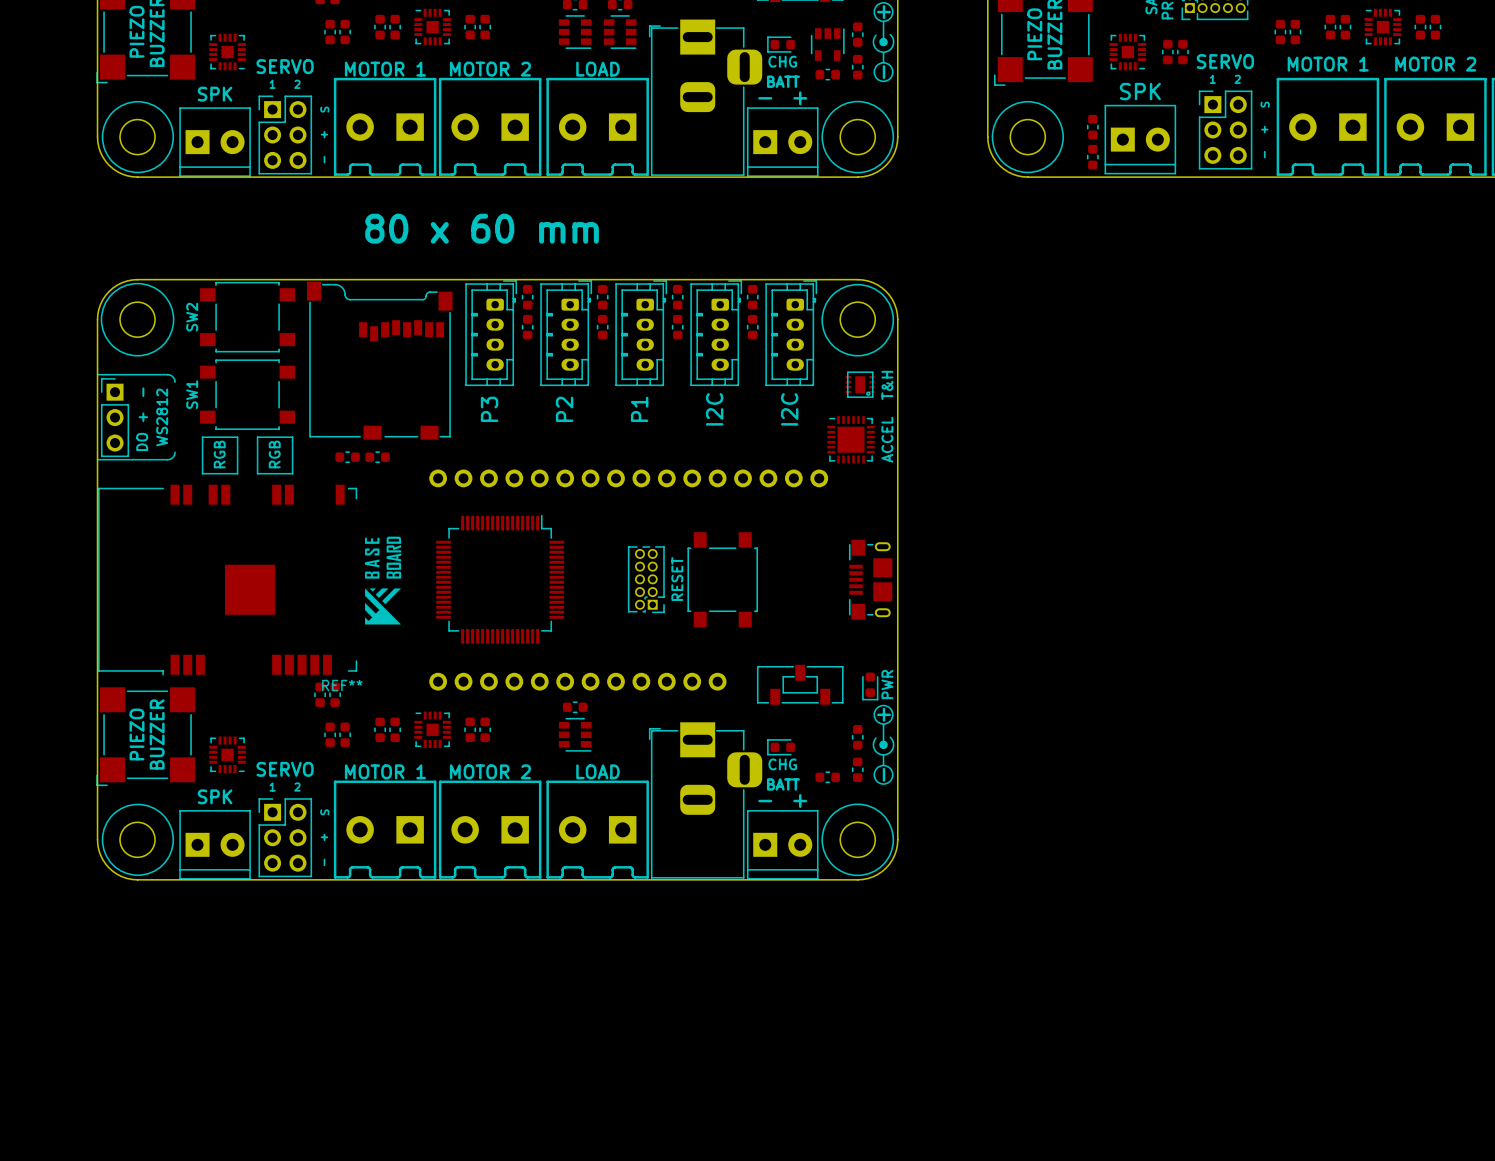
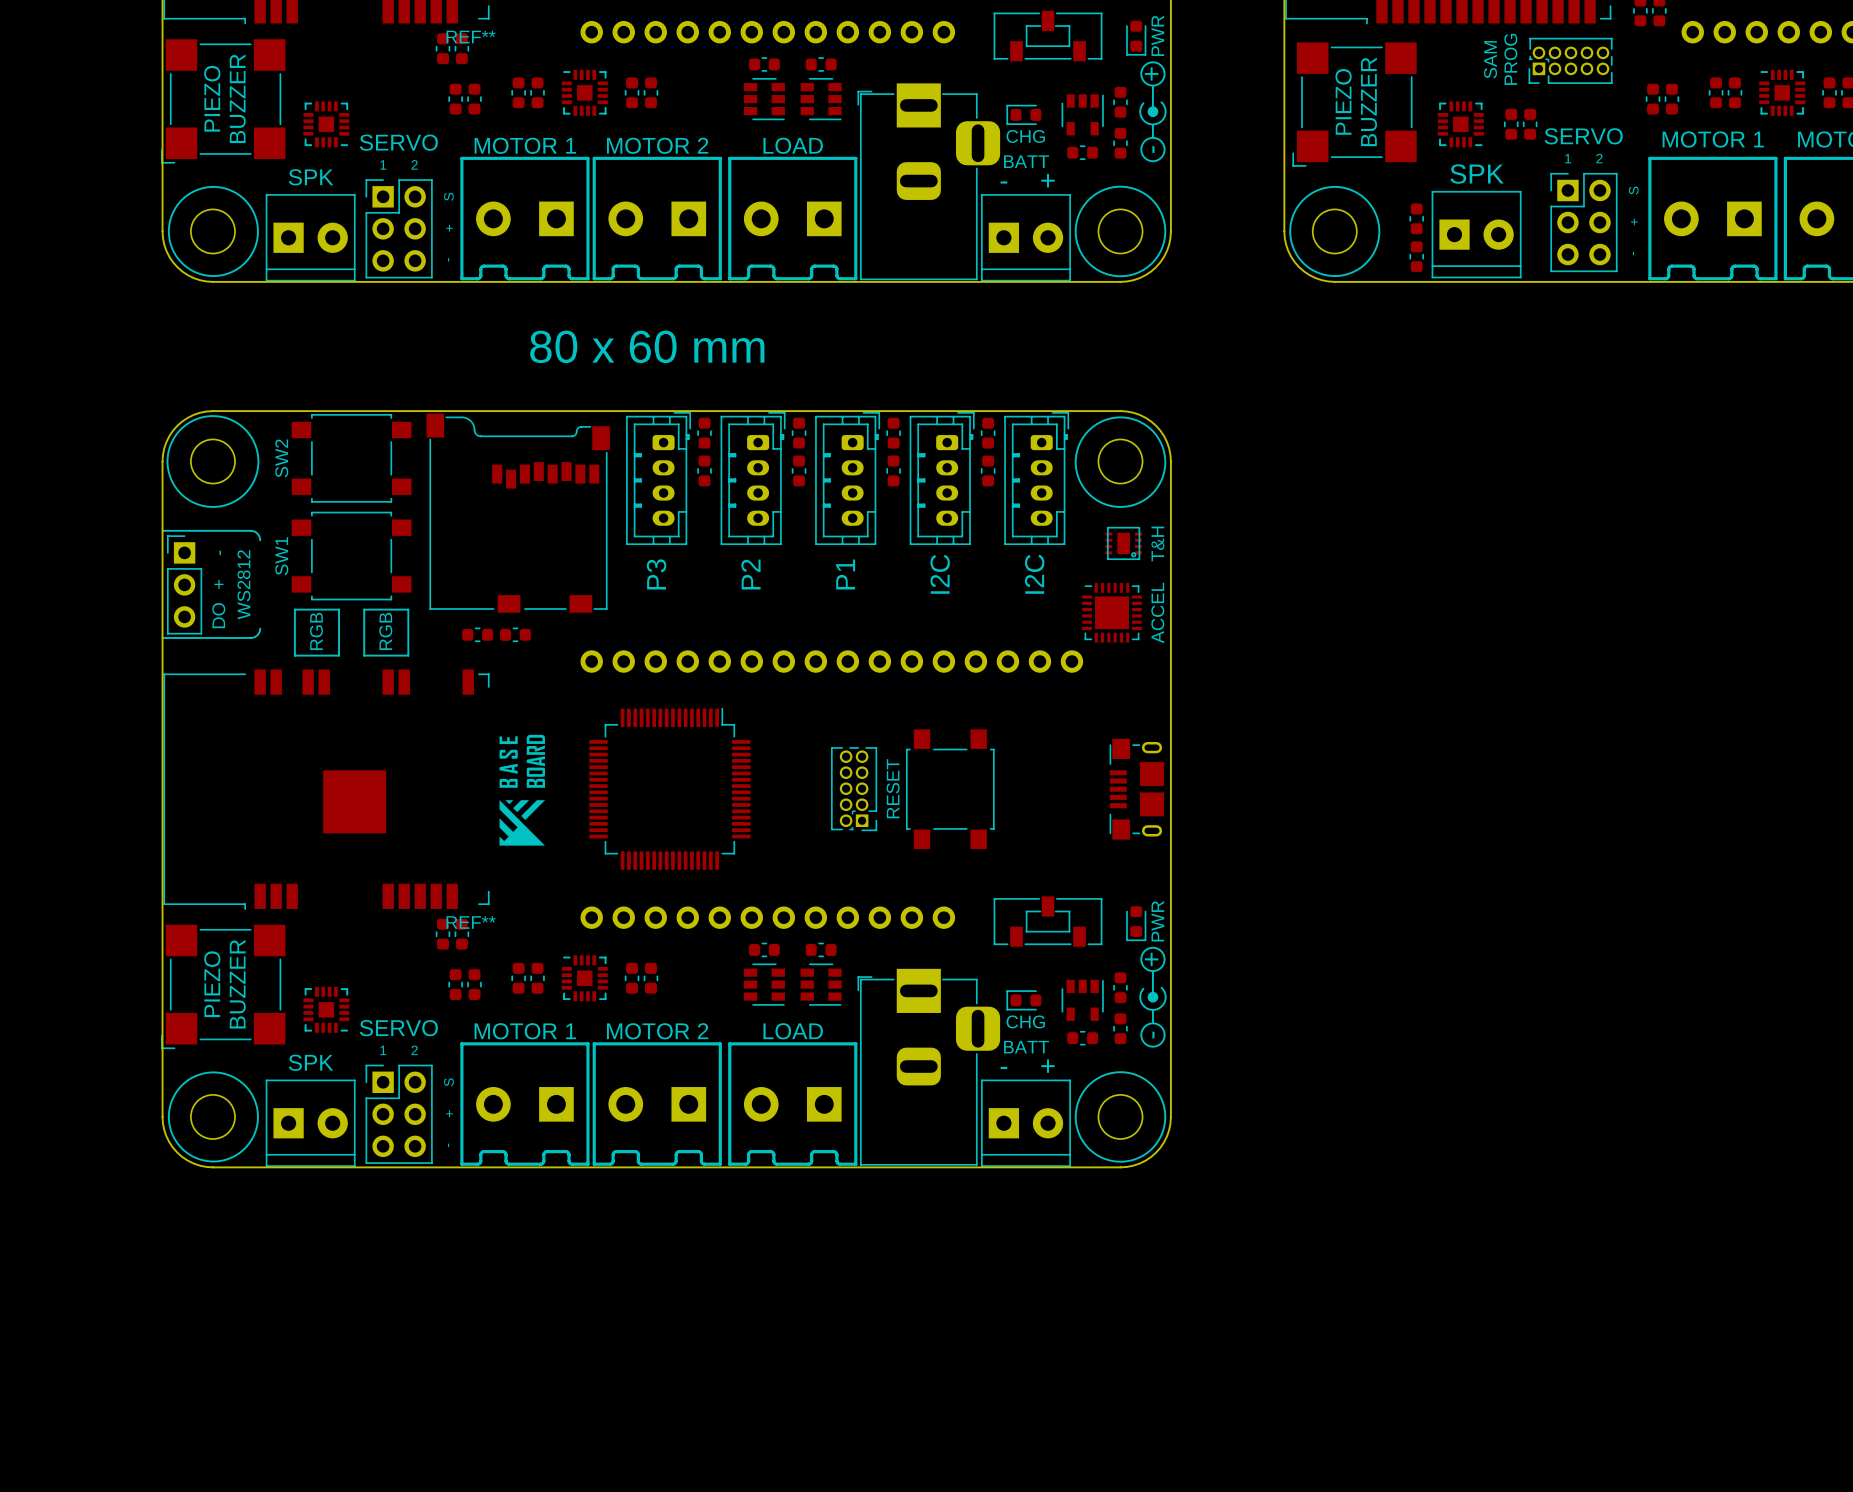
part: none -> (821, 949)
part: none -> (821, 984)
part: none -> (1082, 1000)

